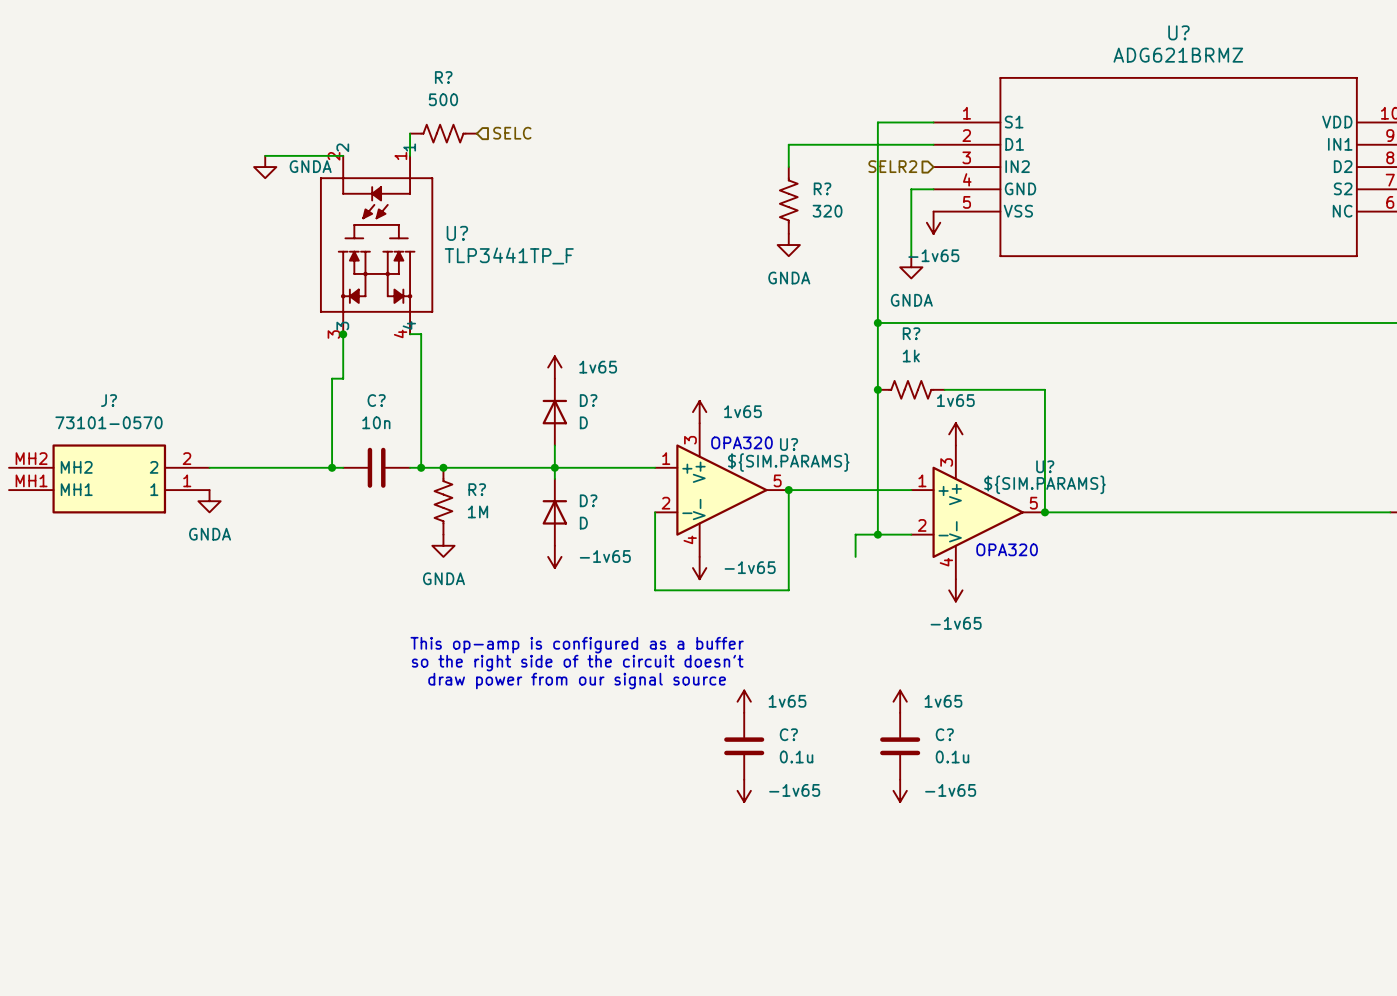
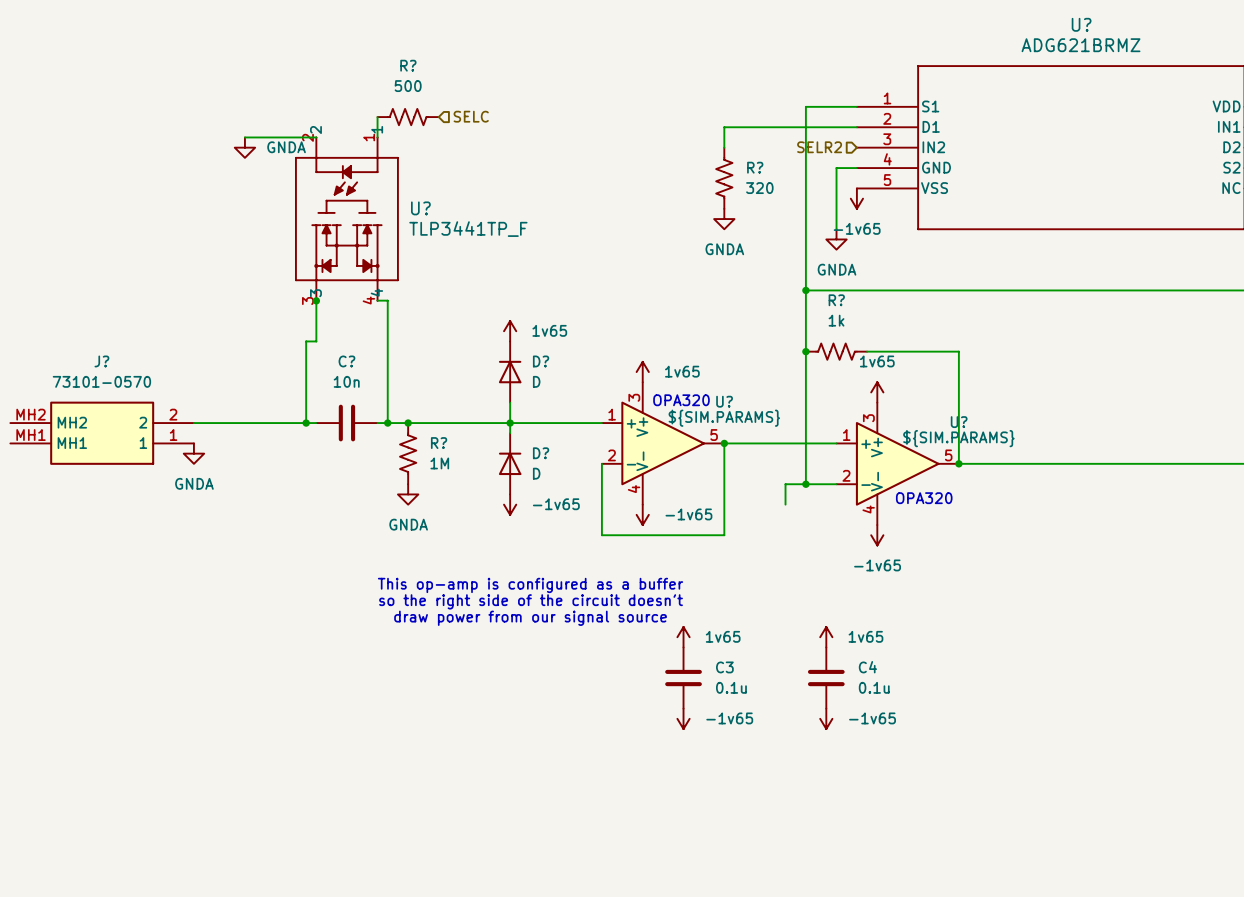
C? name: C? (788, 734) -> C3 (724, 667)
C? name: C? (944, 734) -> C4 (867, 667)

